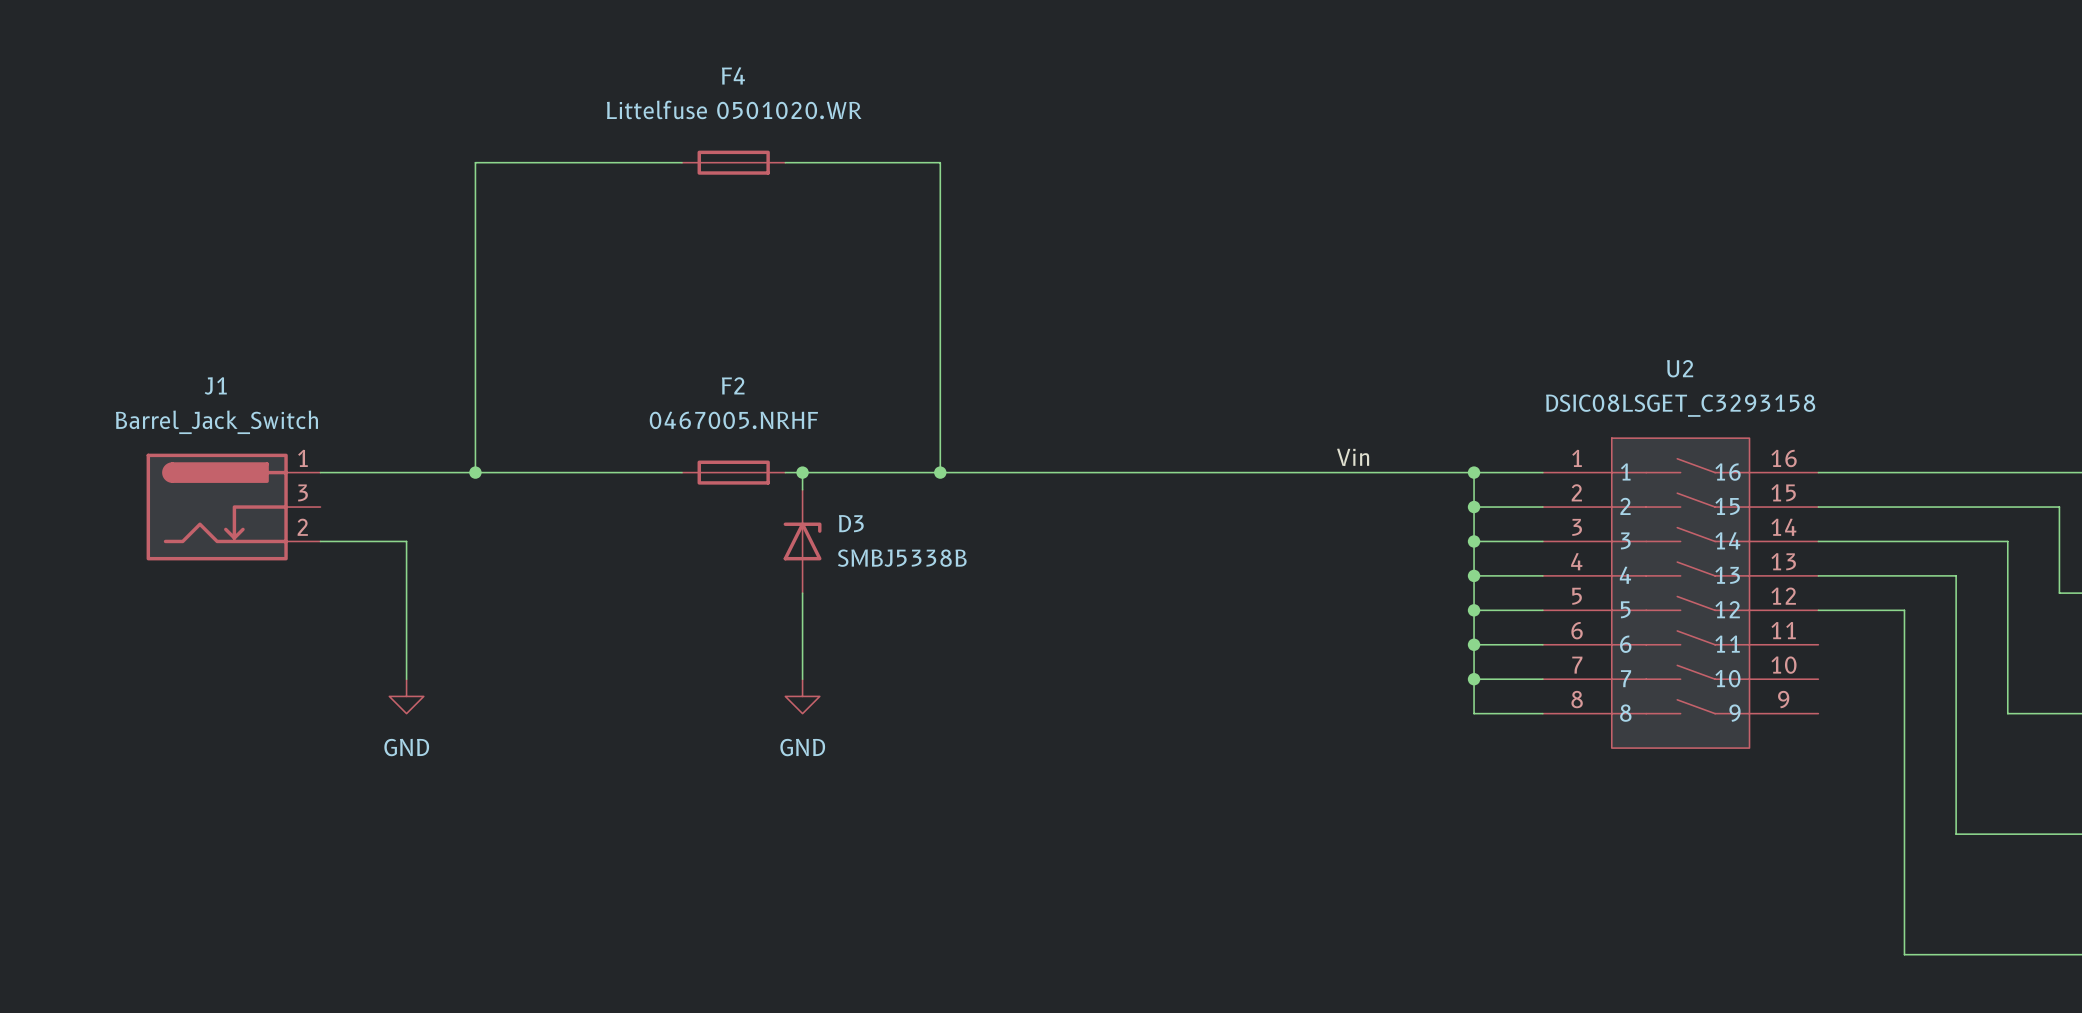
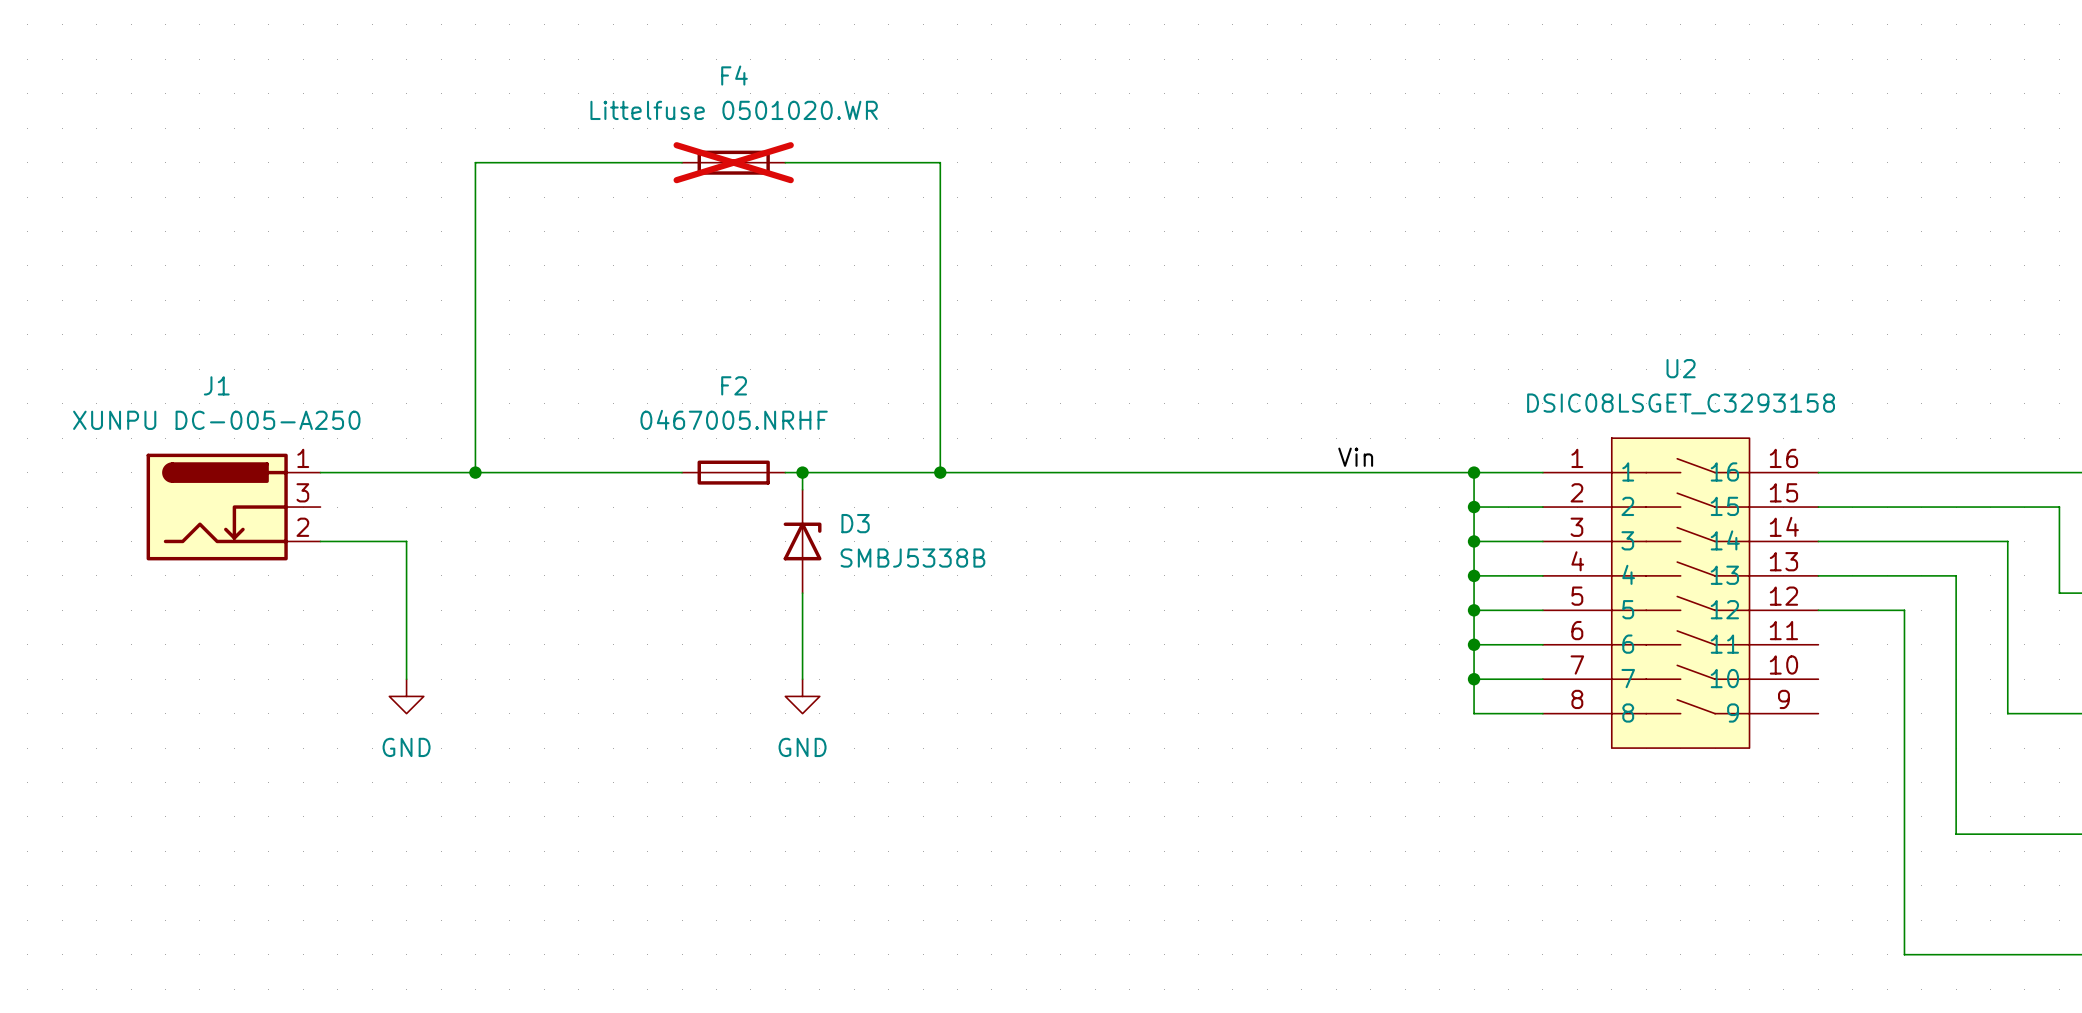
F4 do-not-place cross: none -> (733, 162)
J1 value: Barrel_Jack_Switch (216, 422) -> XUNPU DC-005-A250 (216, 420)

